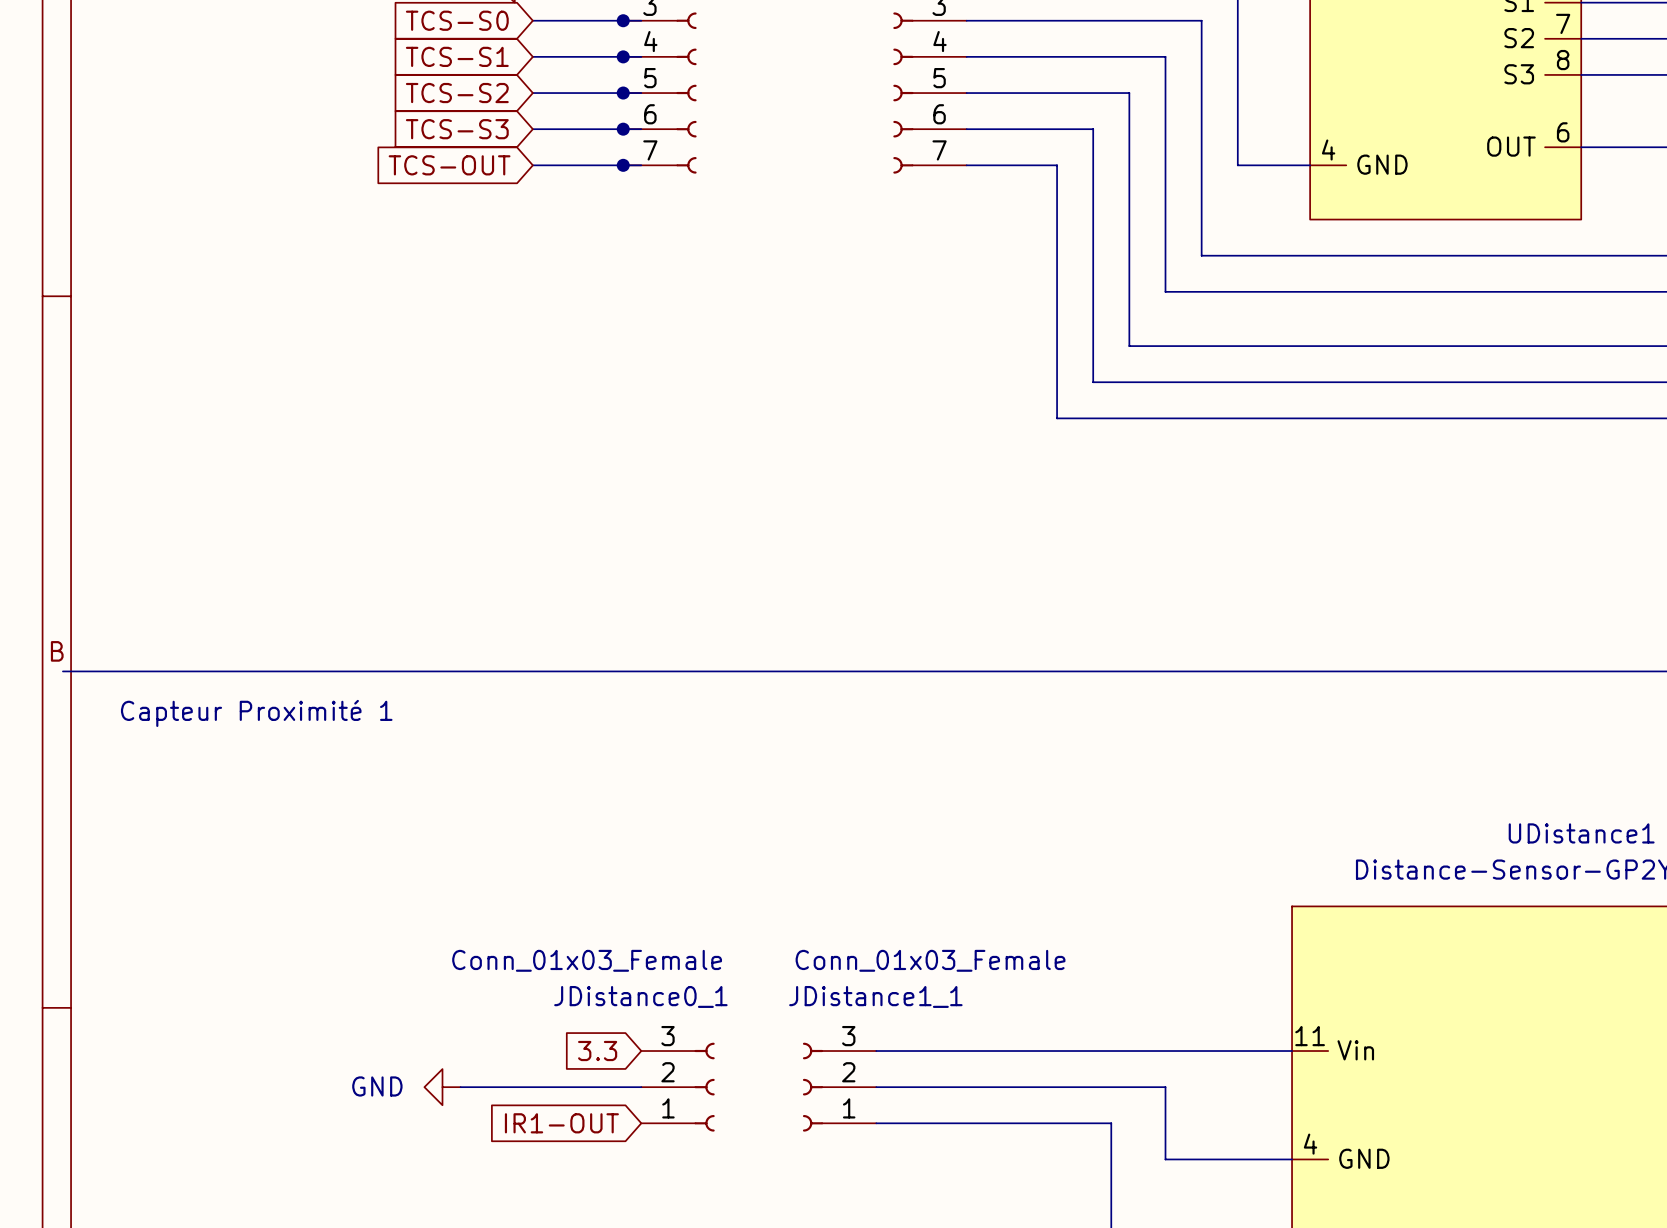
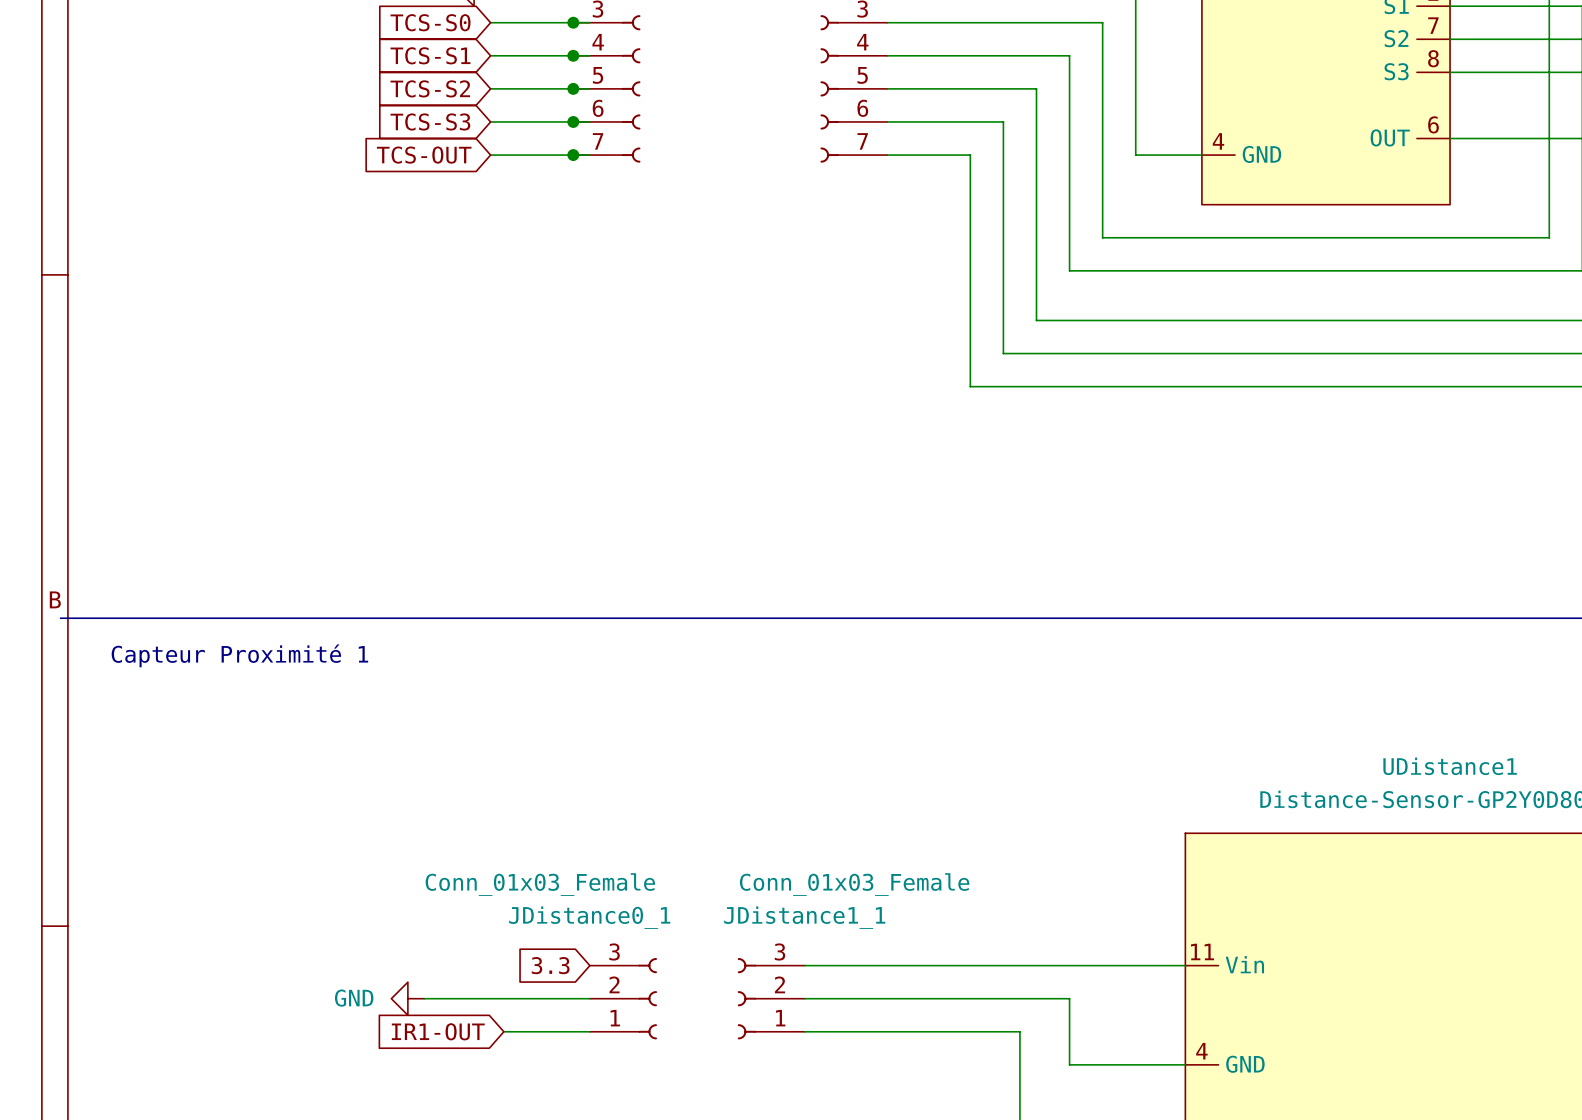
wire: none -> (503, 1031) (589, 1031)
global label position: IR1-OUT (561, 1123) -> IR1-OUT (438, 1031)

